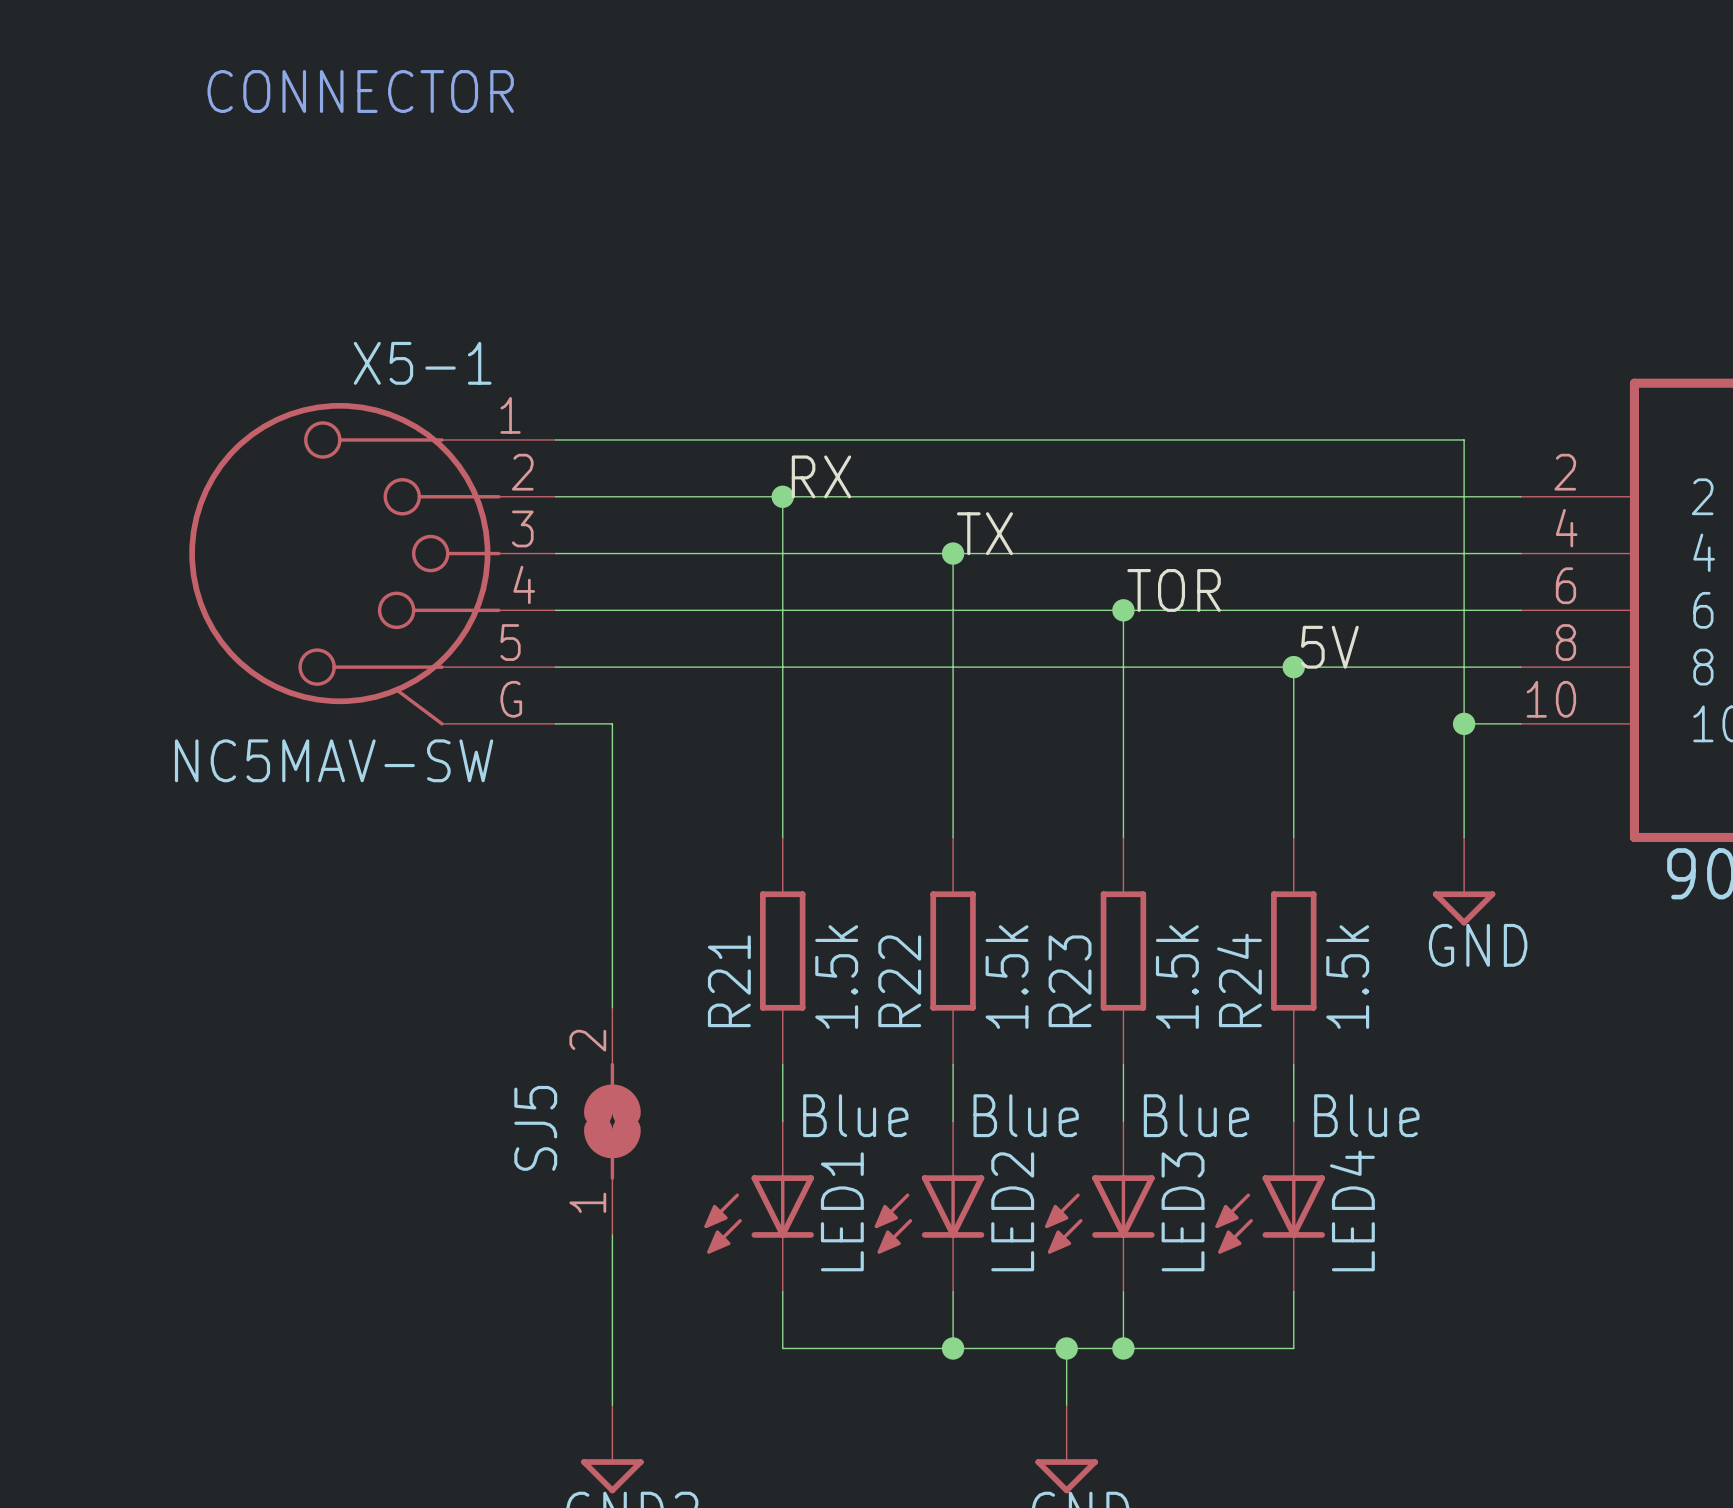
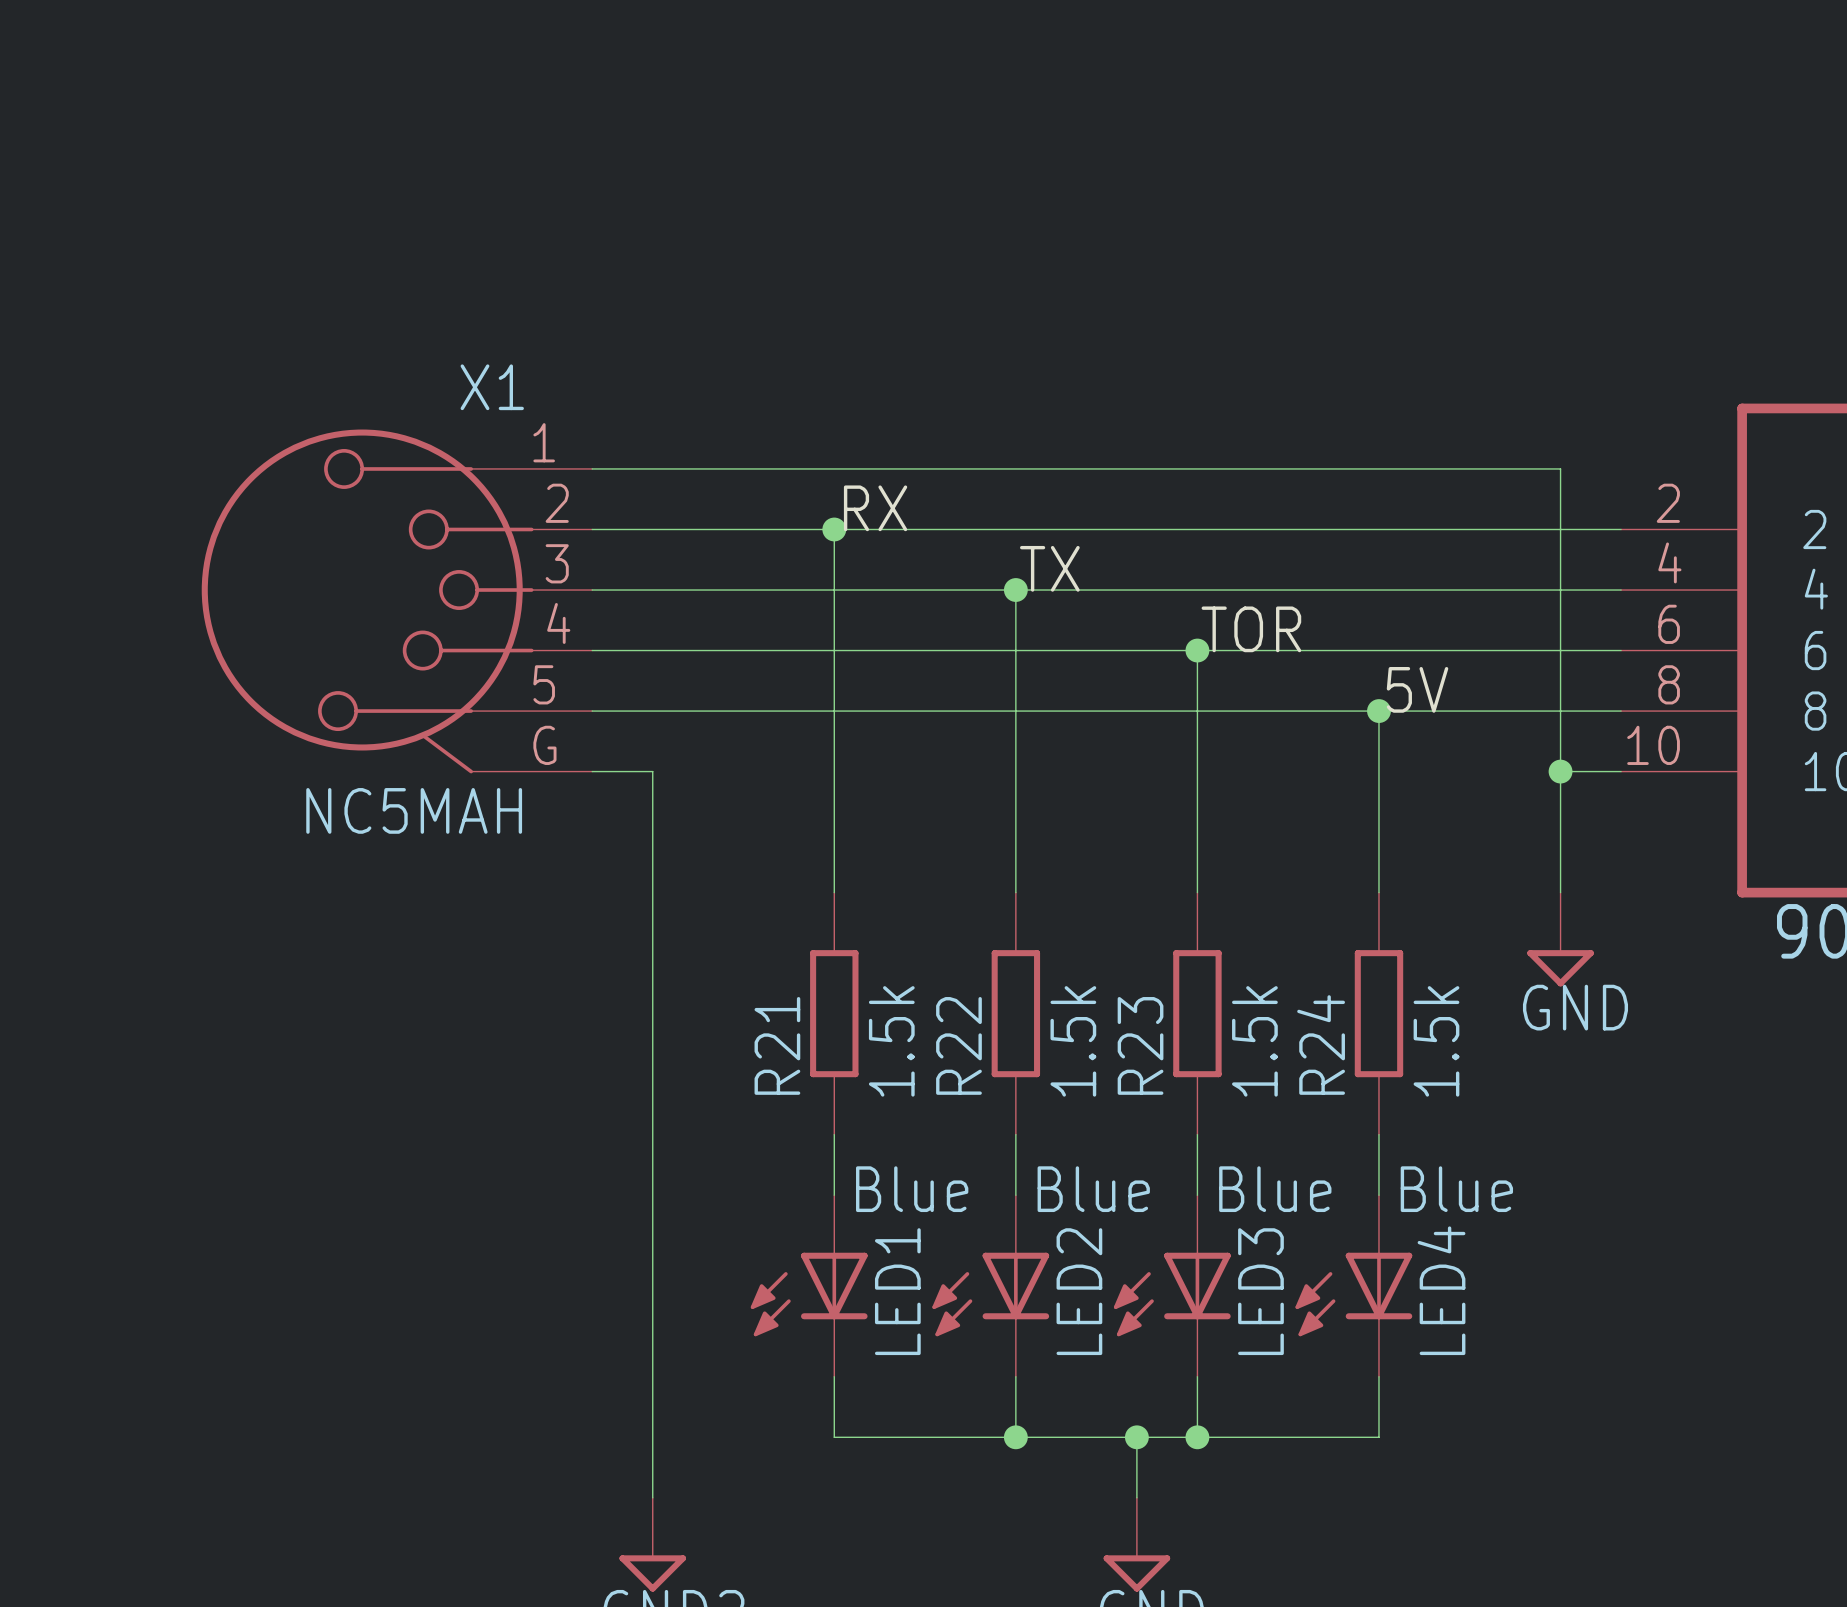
text: CONNECTOR (360, 91) -> none
X5-1 name: X5-1 (422, 363) -> X1 (492, 387)
X5-1 value: NC5MAV-SW (334, 760) -> NC5MAH (414, 810)
SJ5: (612, 1121) -> none

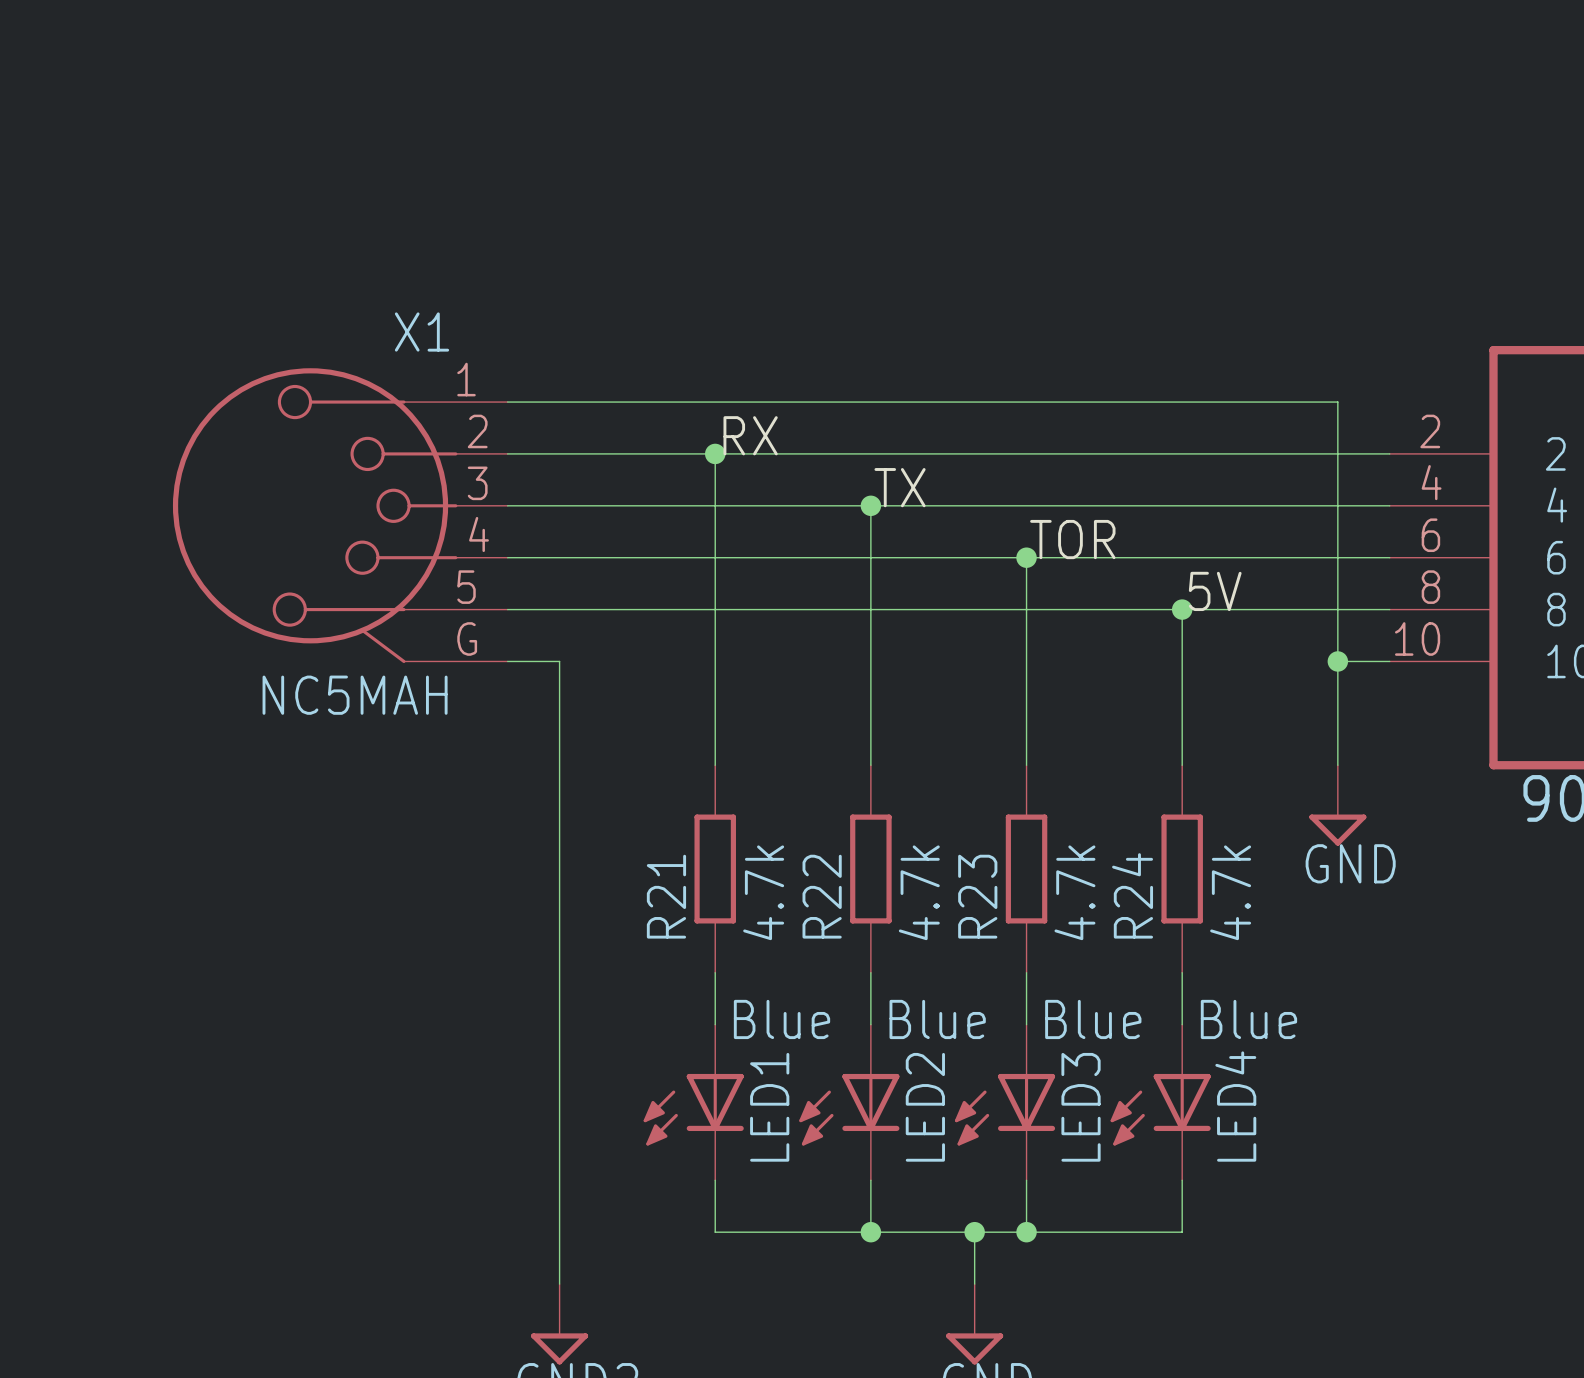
R21 value: 1.5k (891, 1041) -> 4.7k (763, 892)
R22 value: 1.5k (1073, 1041) -> 4.7k (919, 892)
R23 value: 1.5k (1254, 1041) -> 4.7k (1074, 892)
R24 value: 1.5k (1436, 1041) -> 4.7k (1230, 892)

